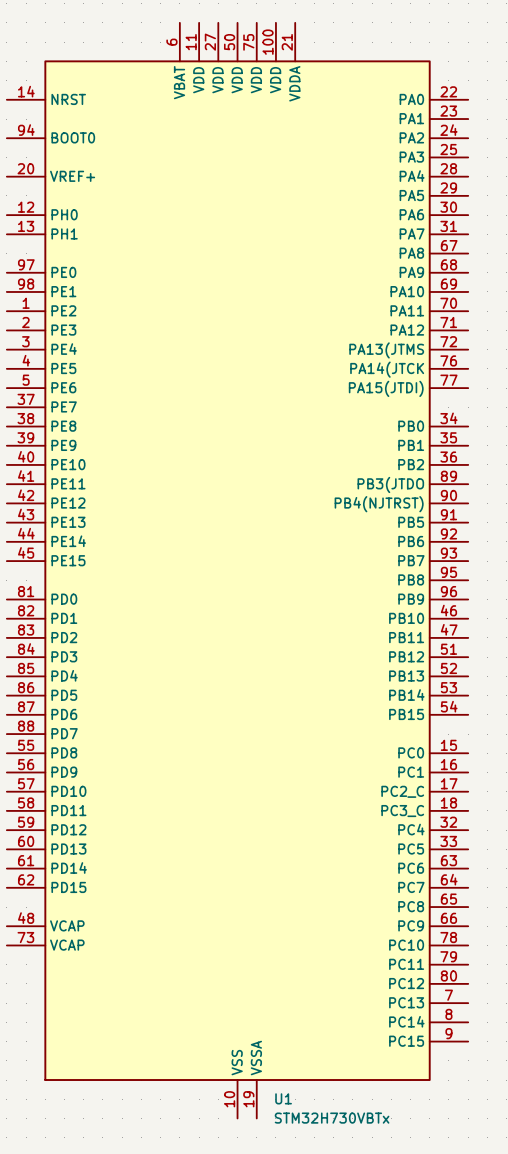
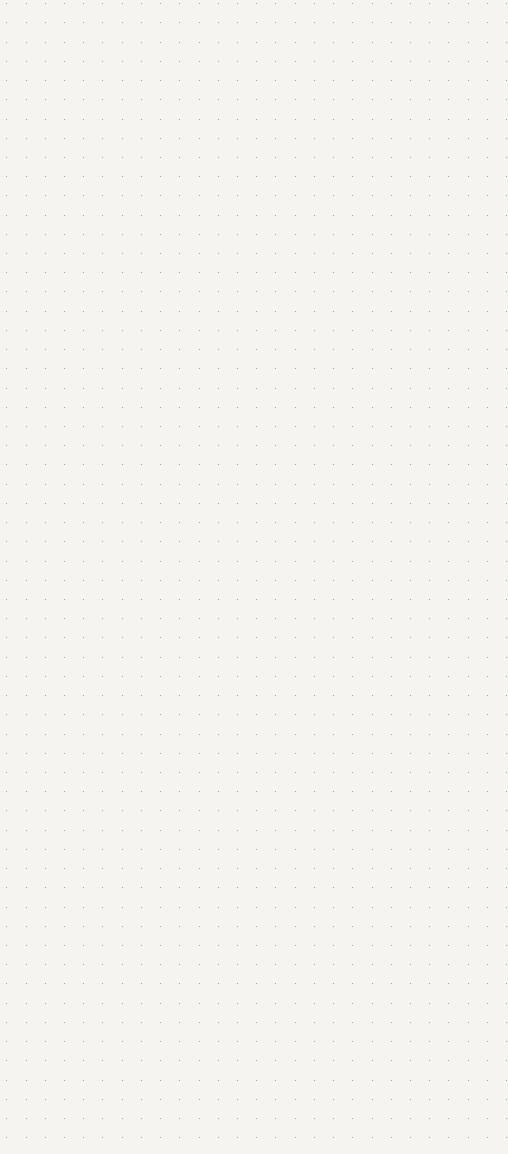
U1: STM32H730VBTx (237, 570) -> none

